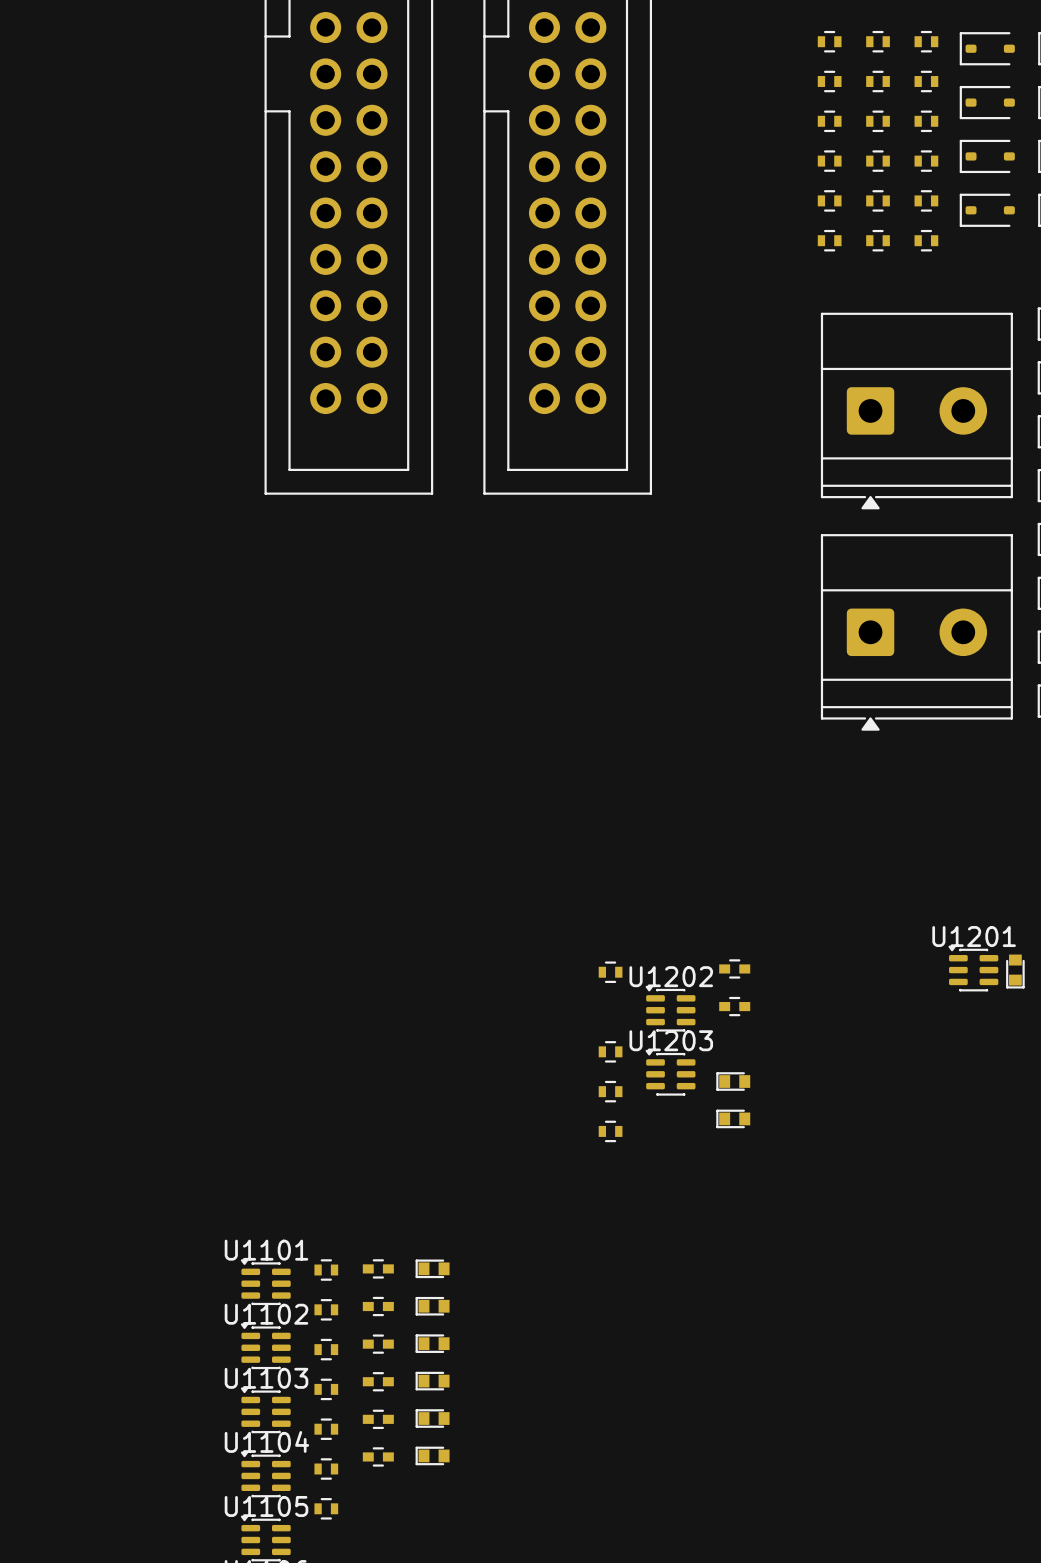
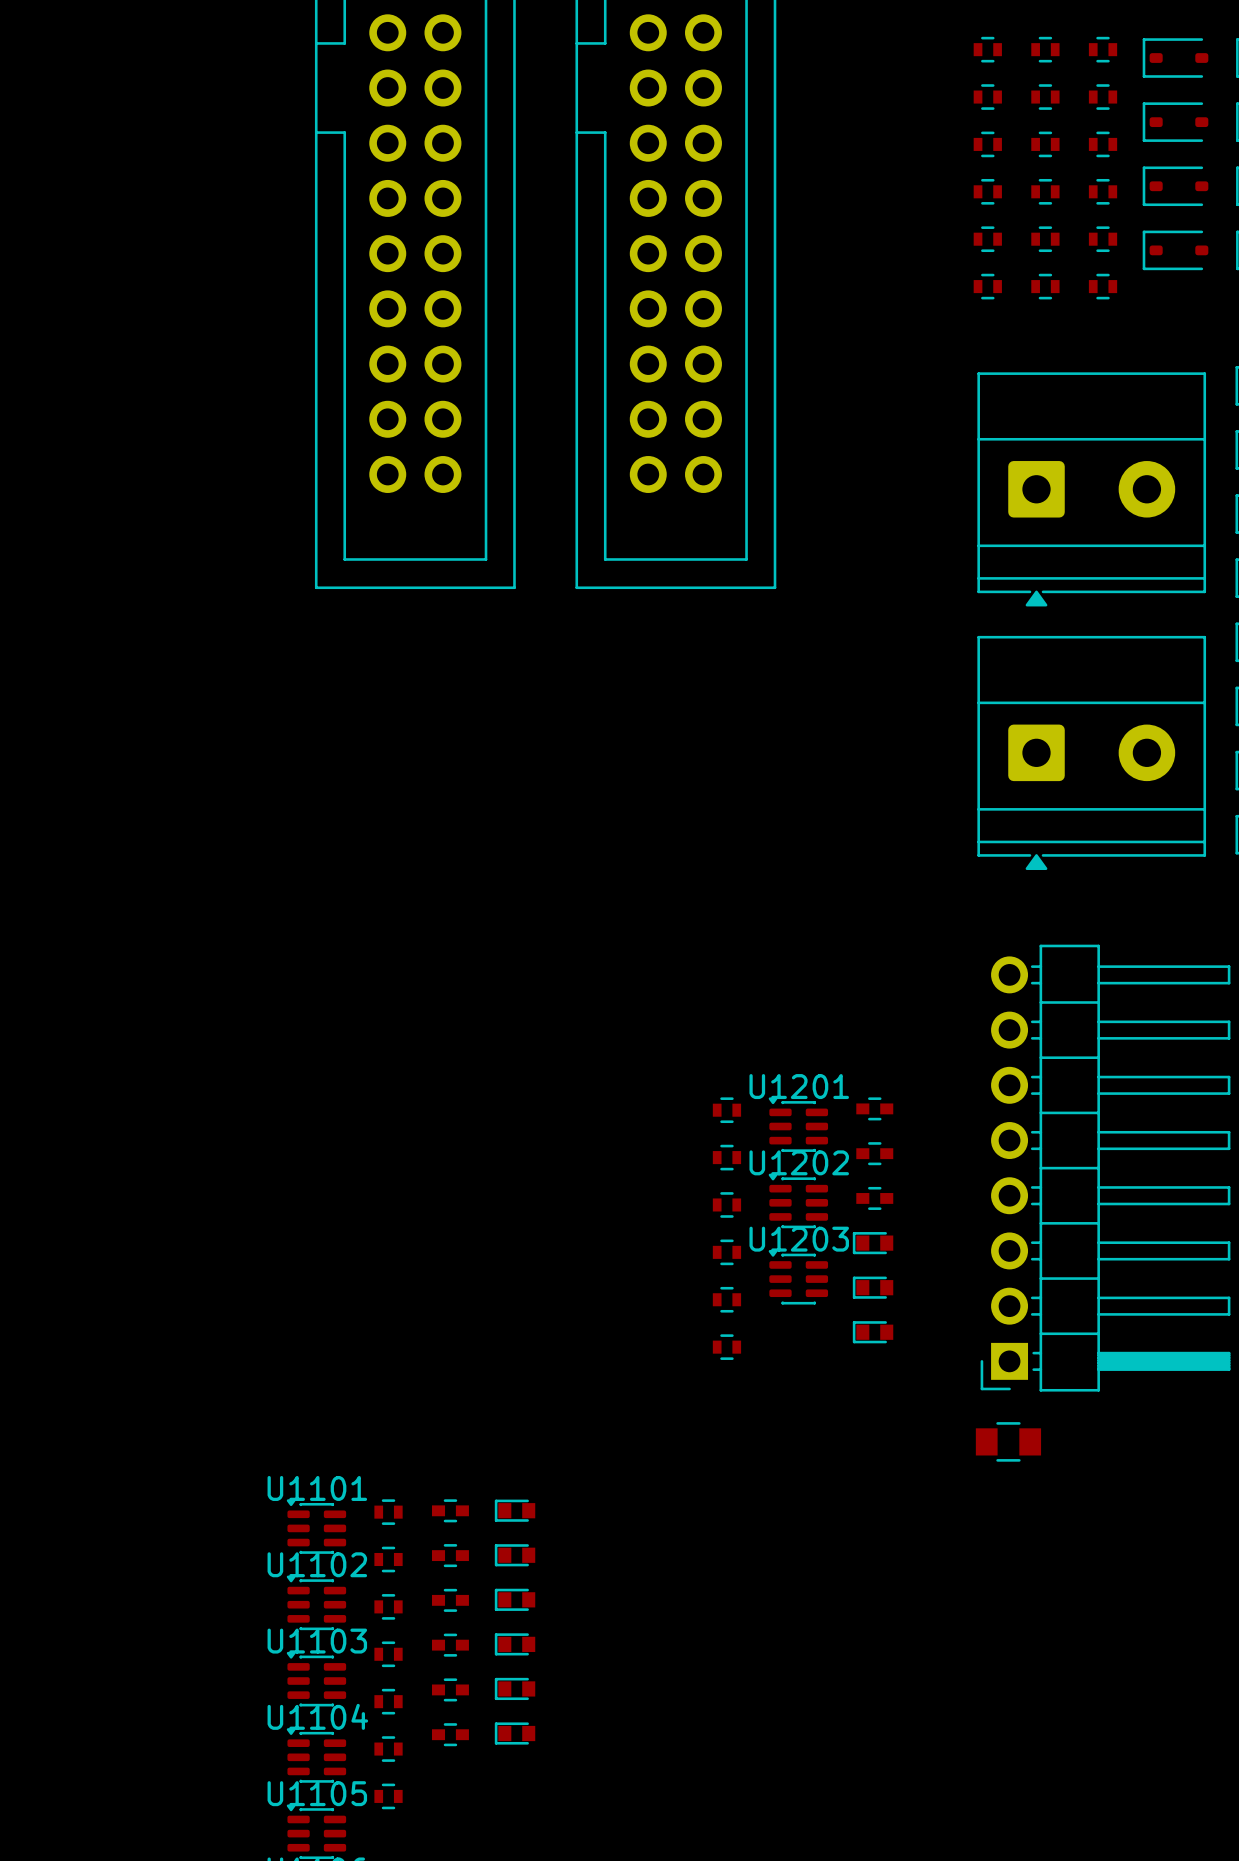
part: none -> (874, 1108)
part: none -> (726, 1110)
U1201 position: (973, 968) -> (798, 1124)
part rotation: 0° (1015, 971) -> 90° clockwise (873, 1243)
part position: (1015, 971) -> (873, 1243)
part: none -> (1105, 1168)
part: none -> (726, 1204)
part: none -> (1008, 1441)

